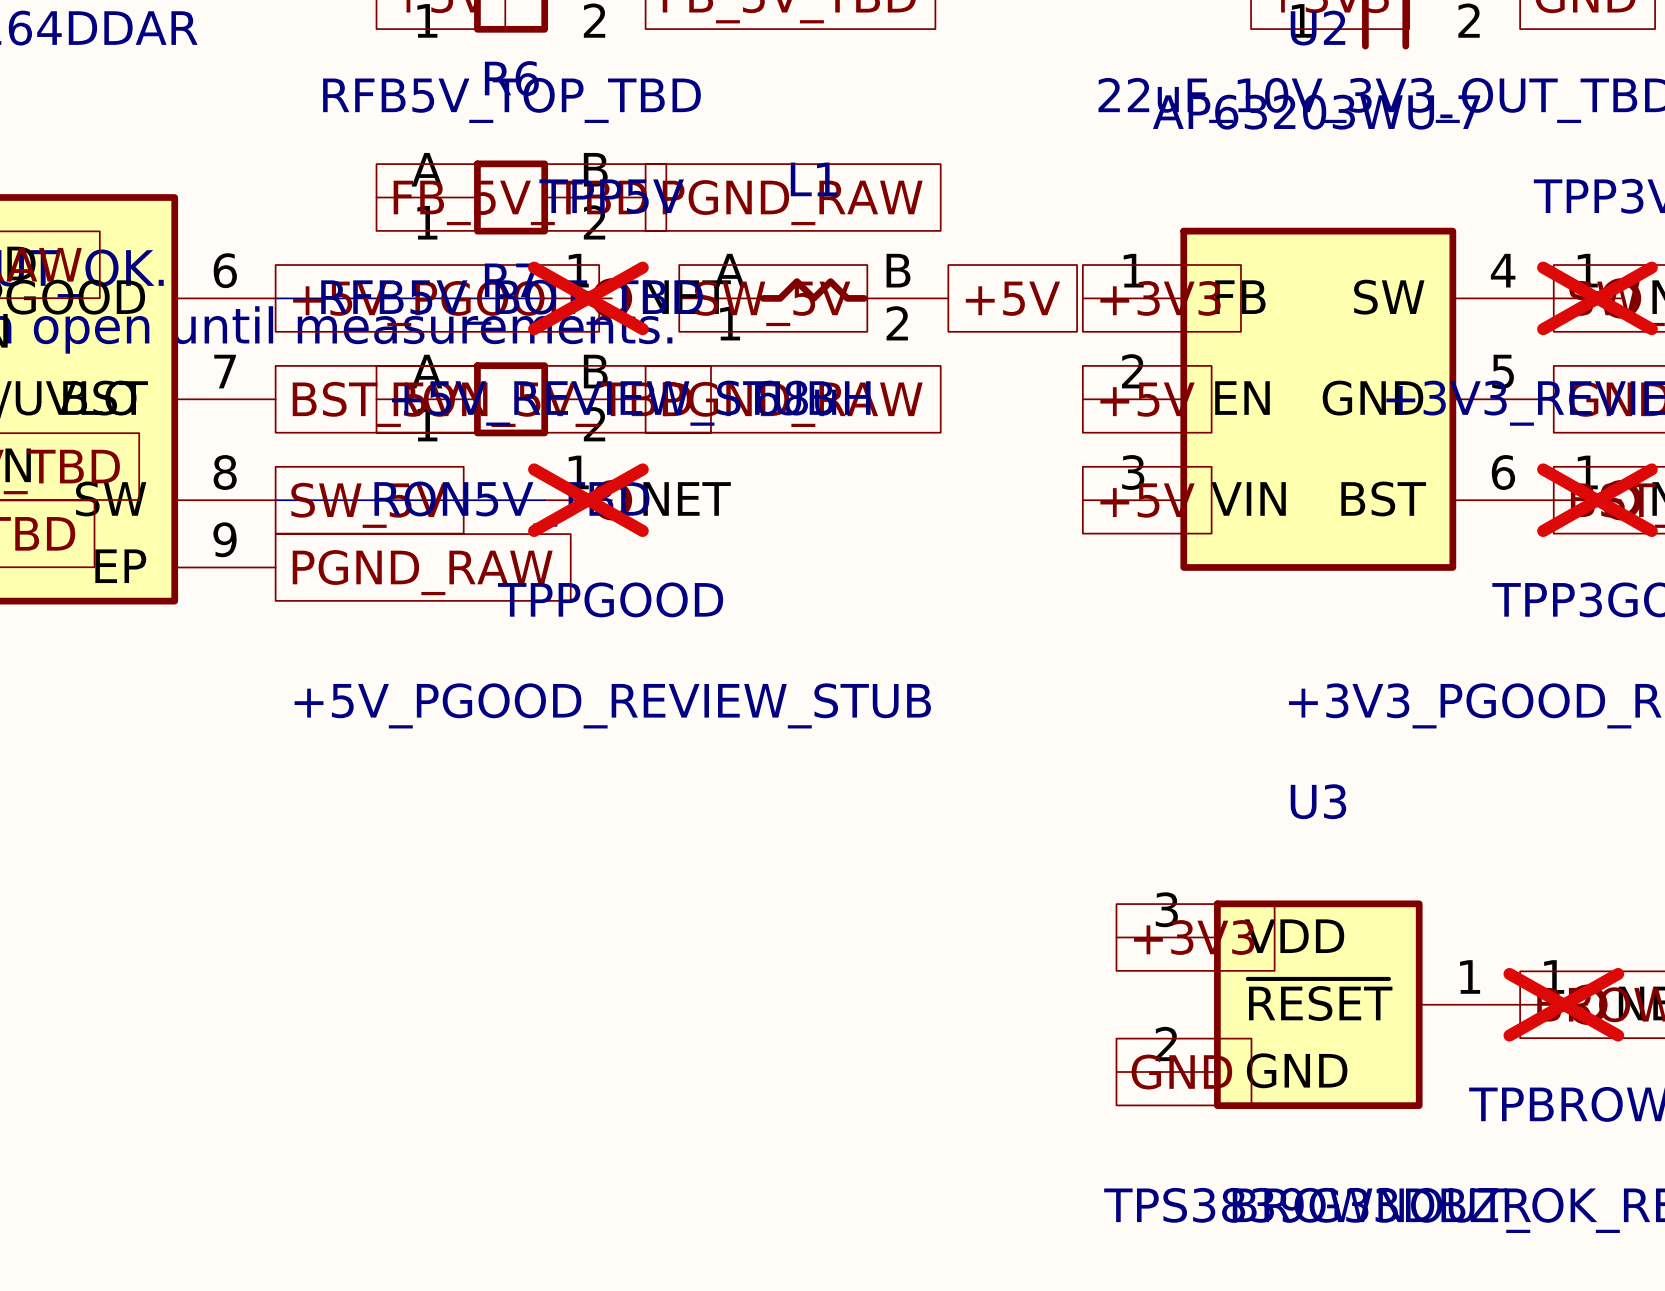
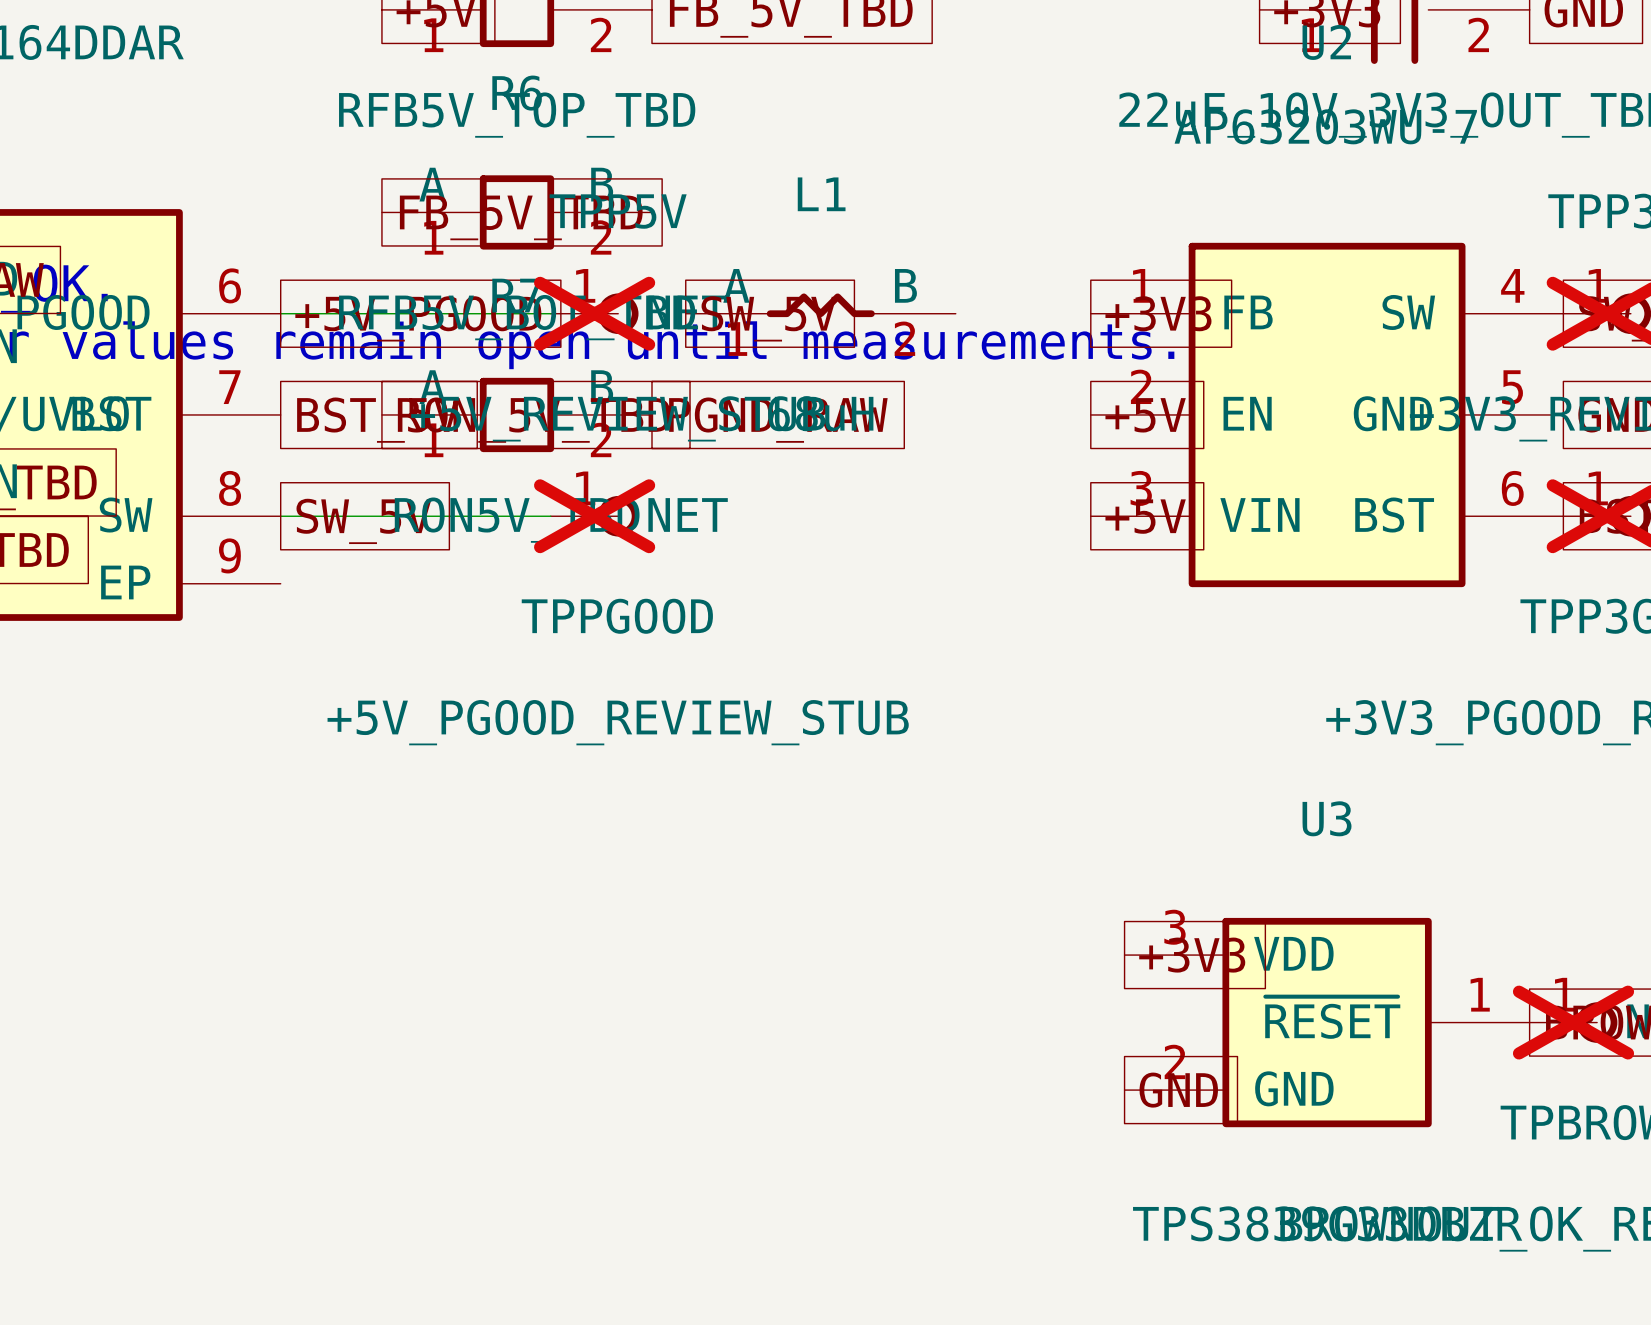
global label: PGND_RAW (792, 202) -> none
global label: +5V (1012, 298) -> none
global label: PGND_RAW (422, 572) -> none

